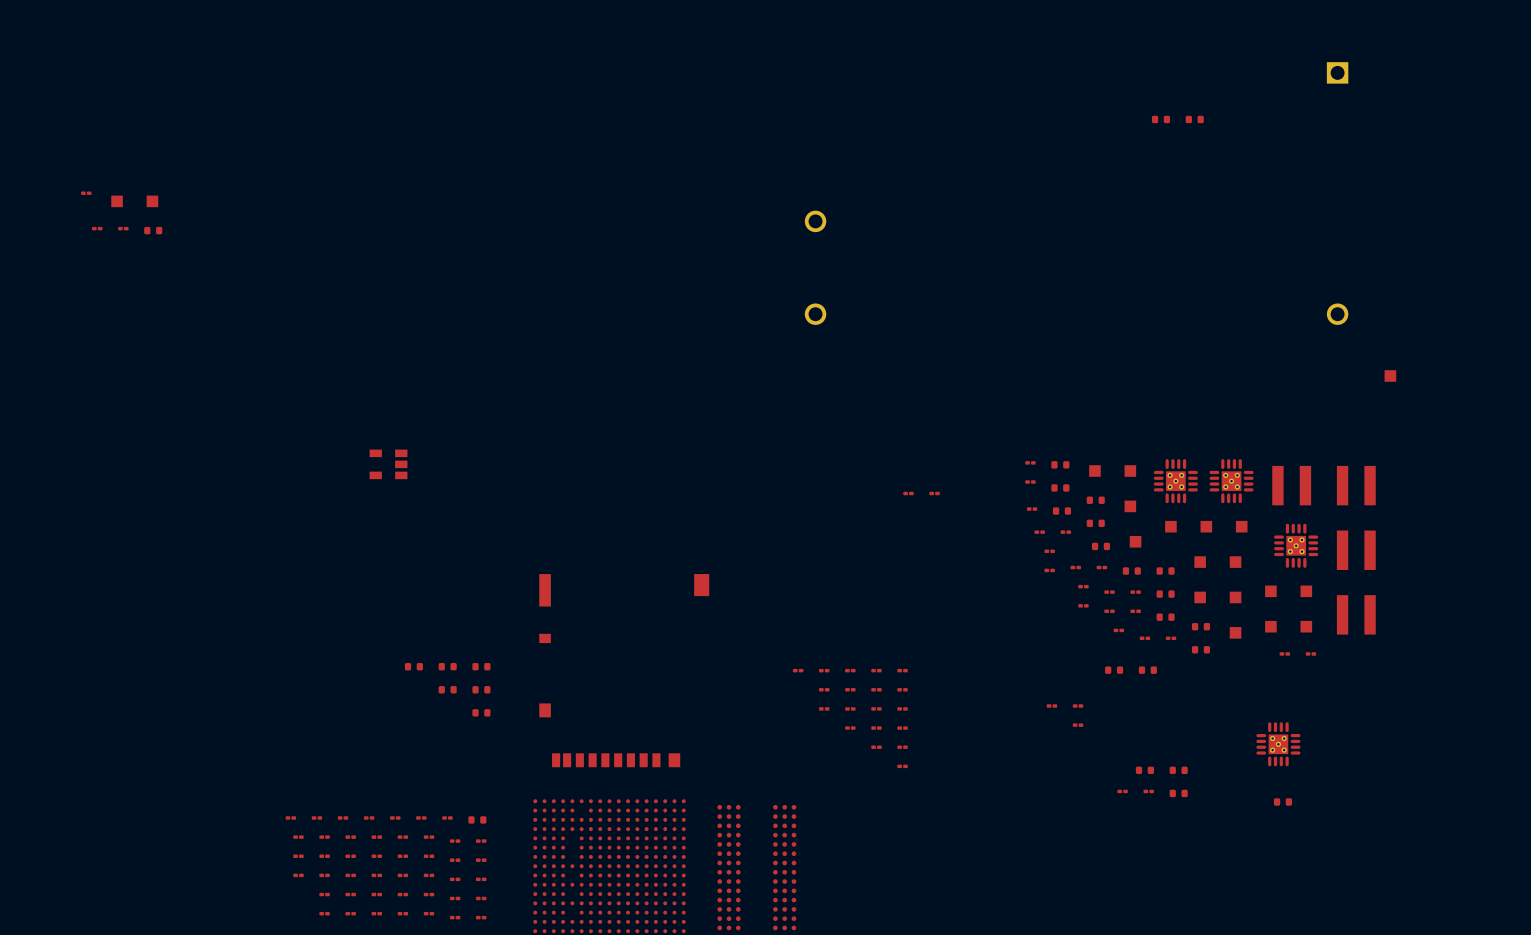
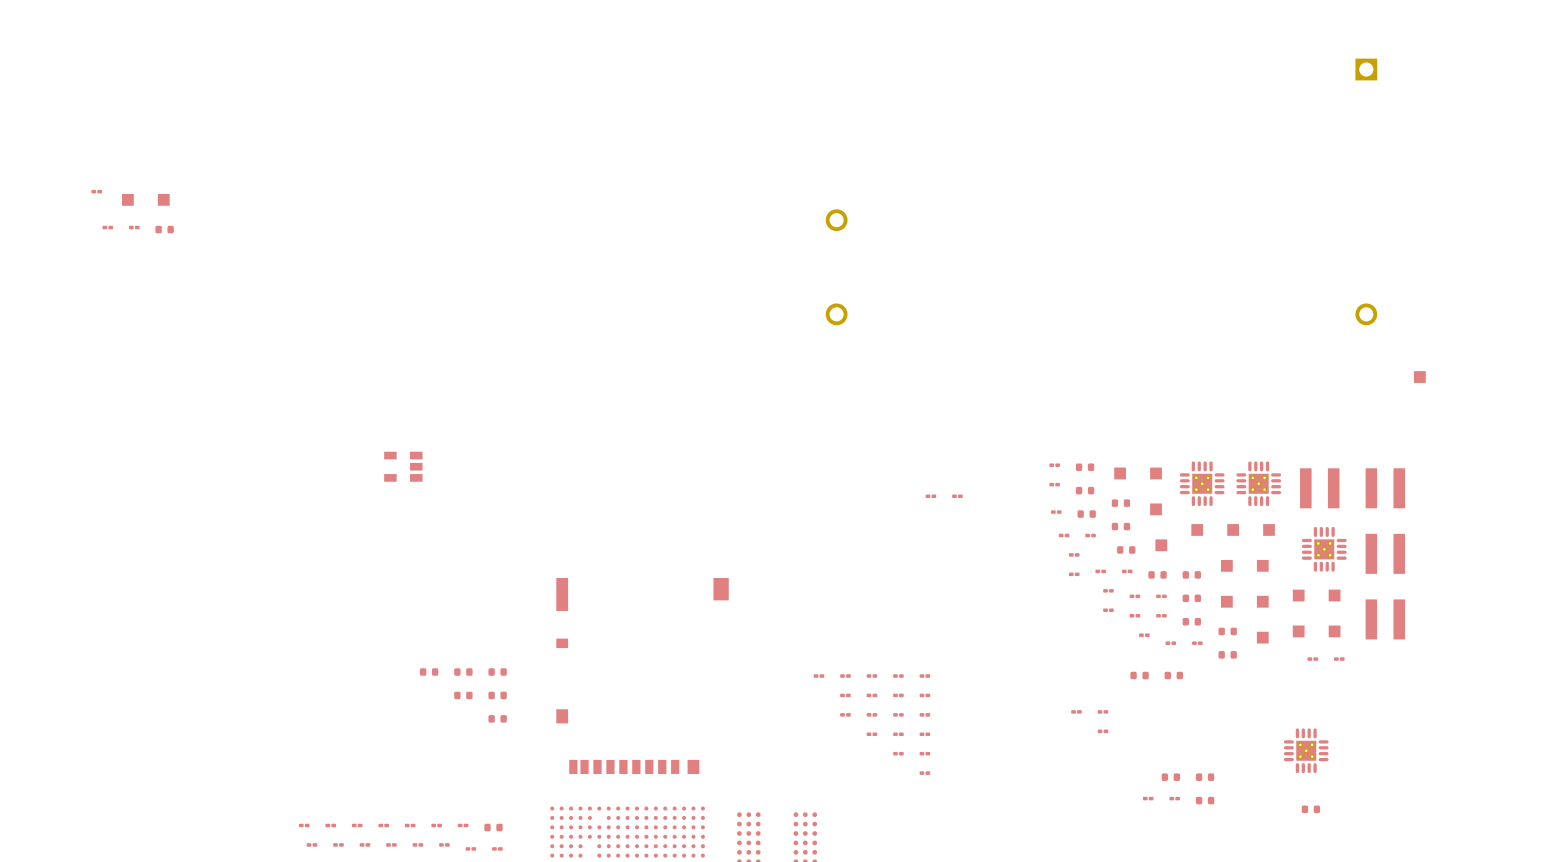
part: (1160, 119) -> none
part: (1194, 119) -> none

